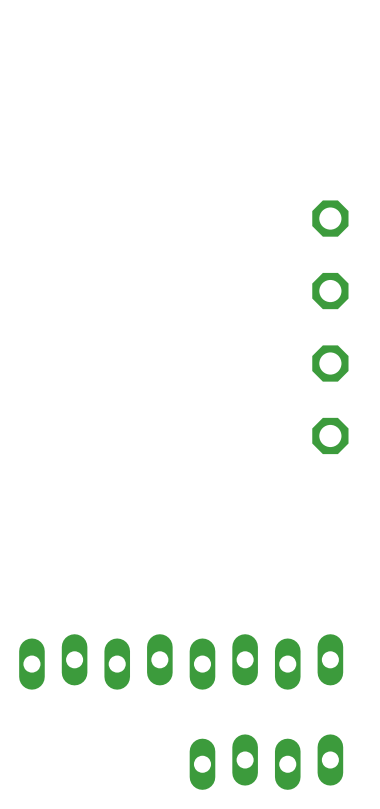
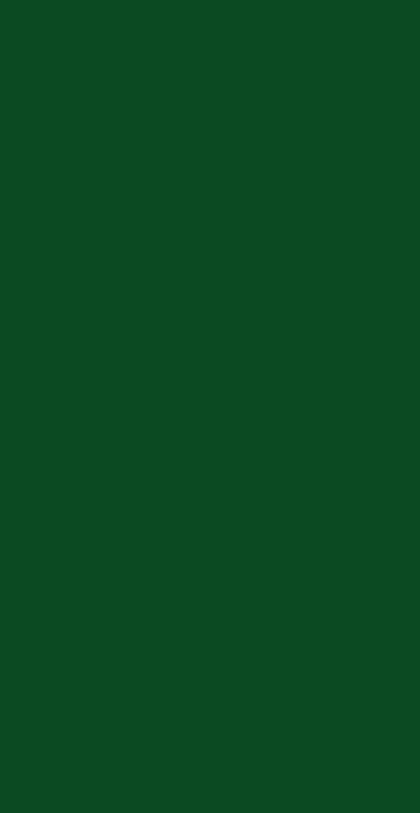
part: (330, 218) -> none
part: (330, 291) -> none
part: (330, 363) -> none
part: (330, 435) -> none
part: (181, 661) -> none
part: (266, 762) -> none

